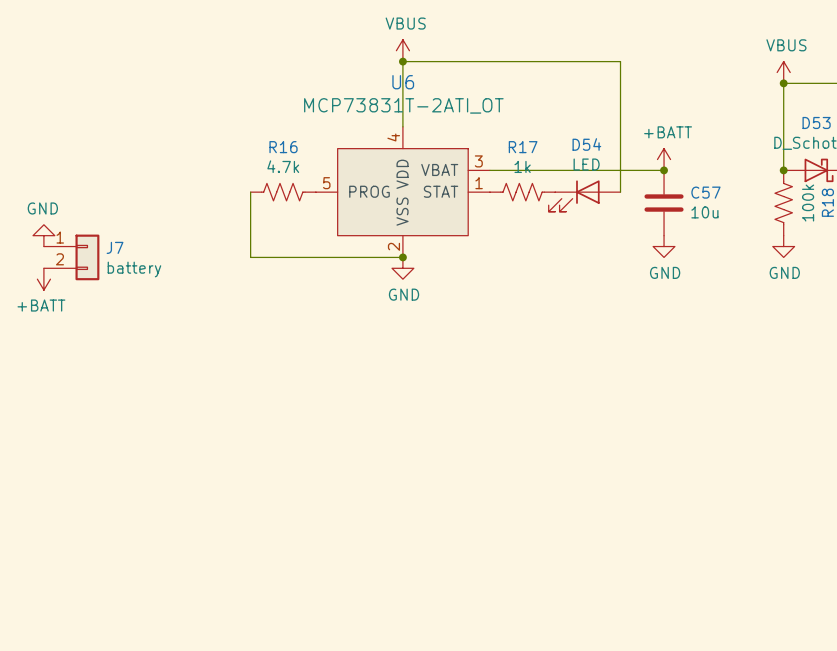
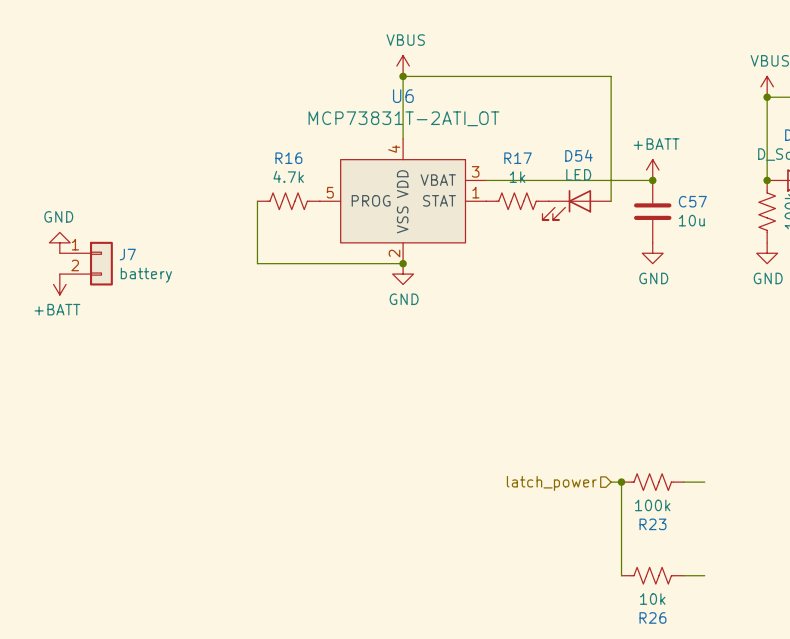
wire: none -> (611, 482) (621, 482) (621, 575)
junction: none -> (621, 482)
R23: none -> 100k (652, 482)
wire: none -> (683, 482) (704, 482)
hierarchical label: none -> latch_power (551, 483)
R26: none -> 10k (652, 575)
wire: none -> (683, 575) (704, 575)

